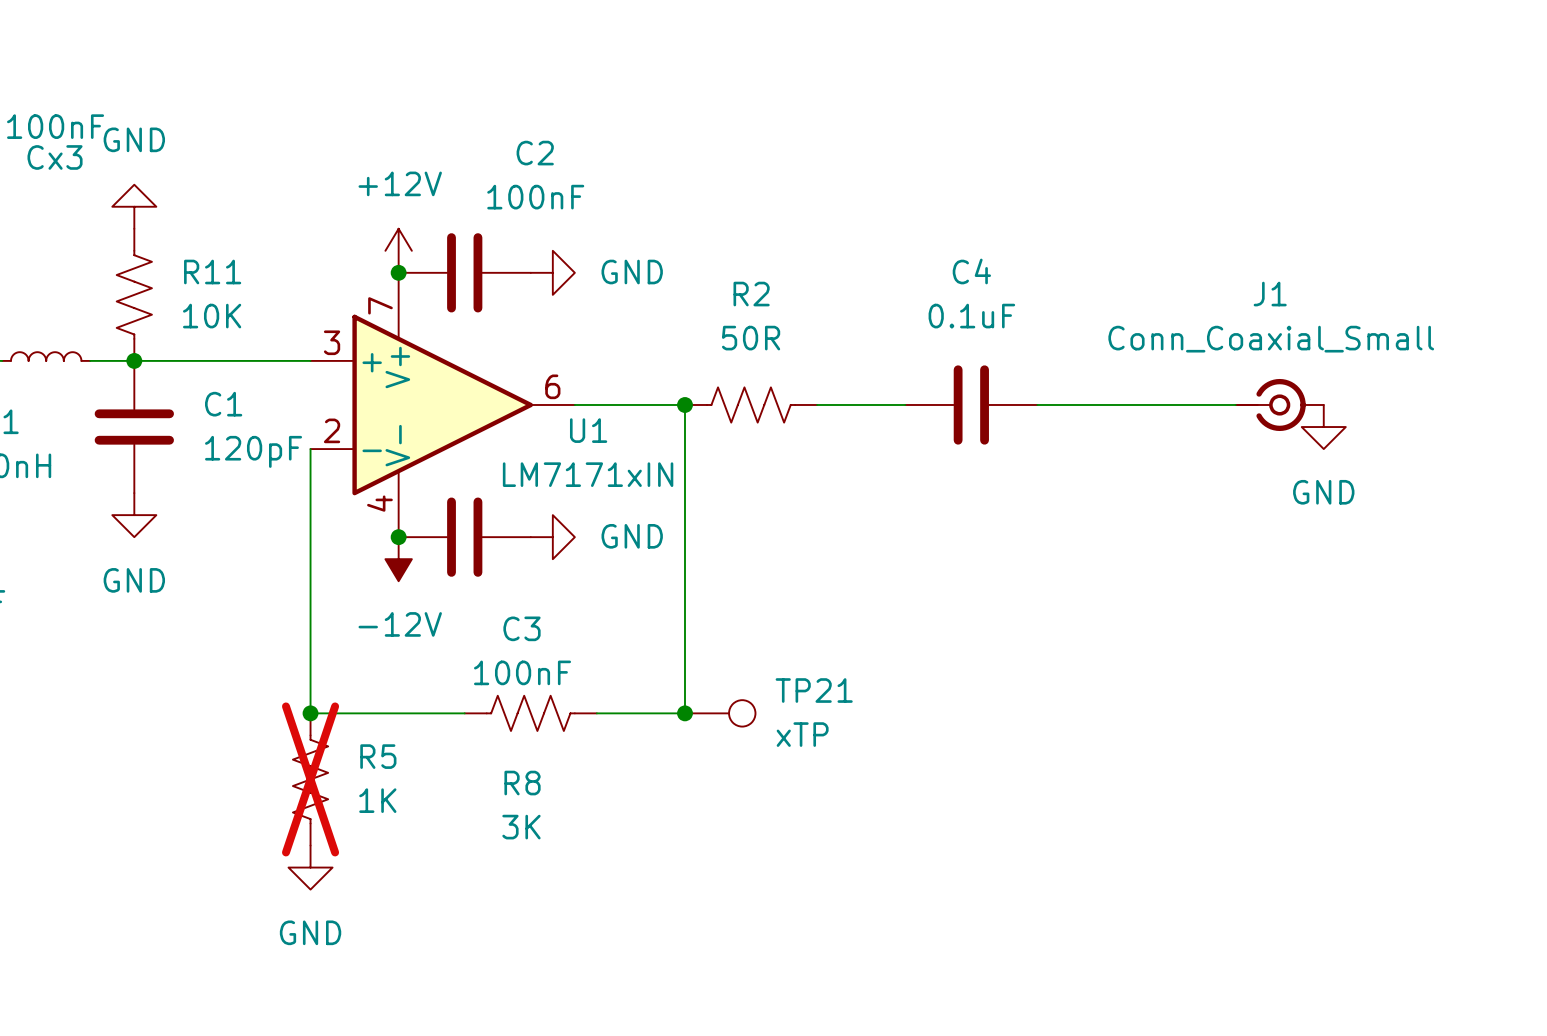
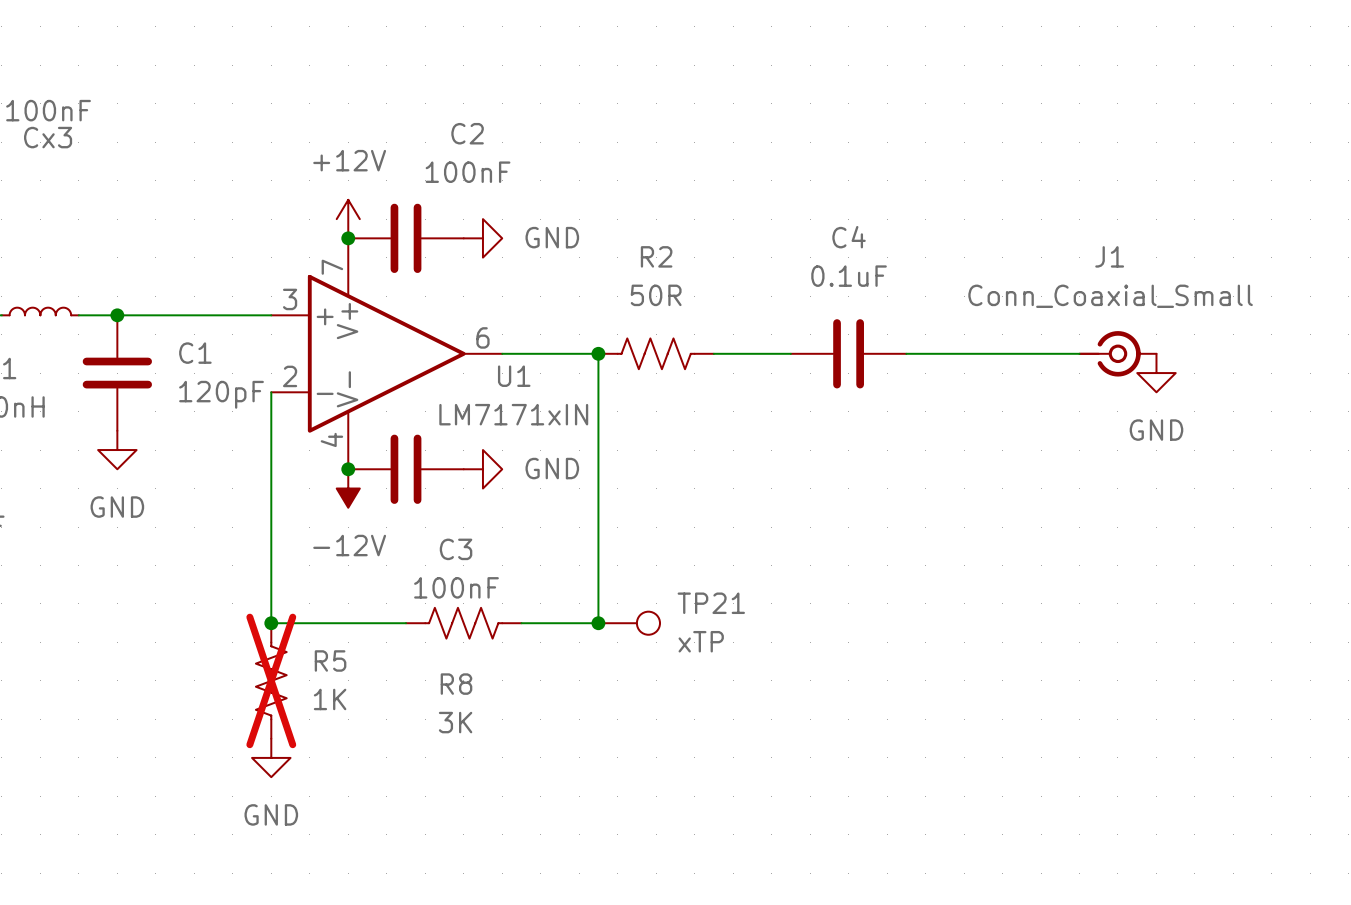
power symbol: GND (134, 206) -> none
R11: 10K (134, 294) -> none

